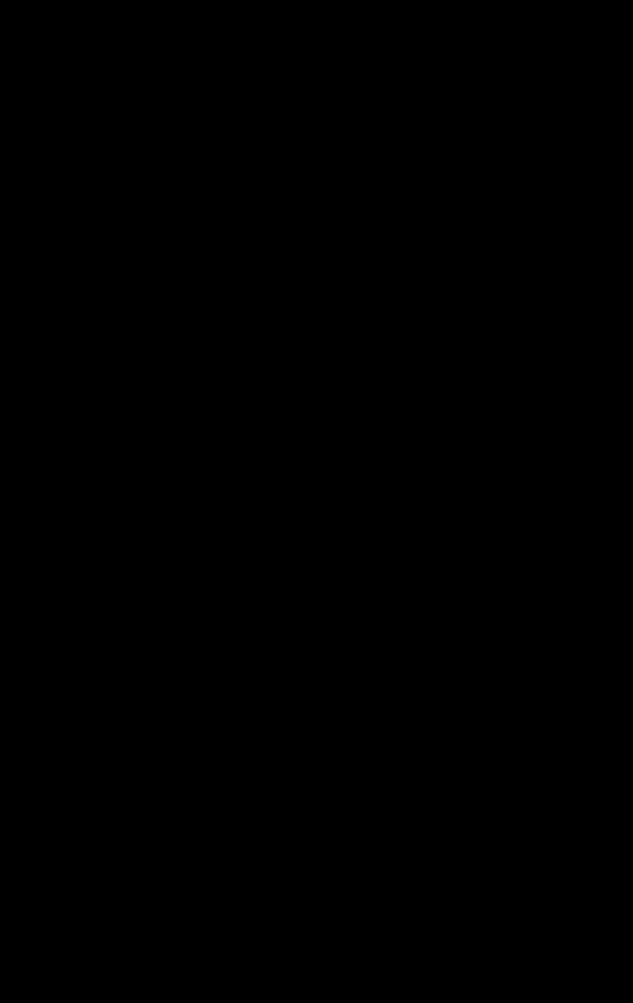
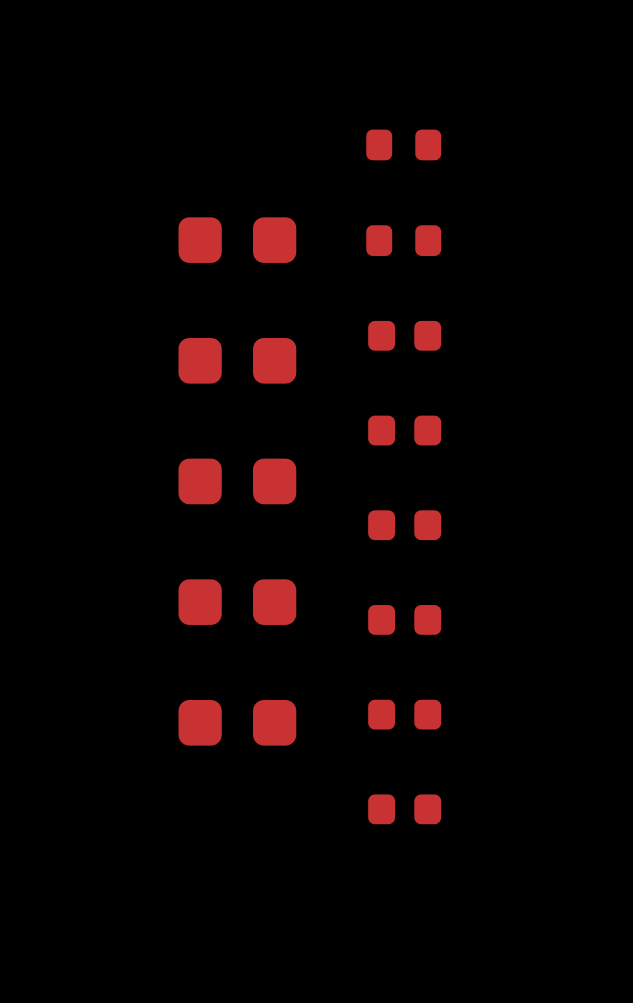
part: none -> (403, 144)
part: none -> (237, 240)
part: none -> (403, 240)
part: none -> (404, 335)
part: none -> (237, 360)
part: none -> (404, 430)
part: none -> (237, 481)
part: none -> (404, 525)
part: none -> (237, 602)
part: none -> (404, 619)
part: none -> (404, 714)
part: none -> (237, 722)
part: none -> (404, 809)

